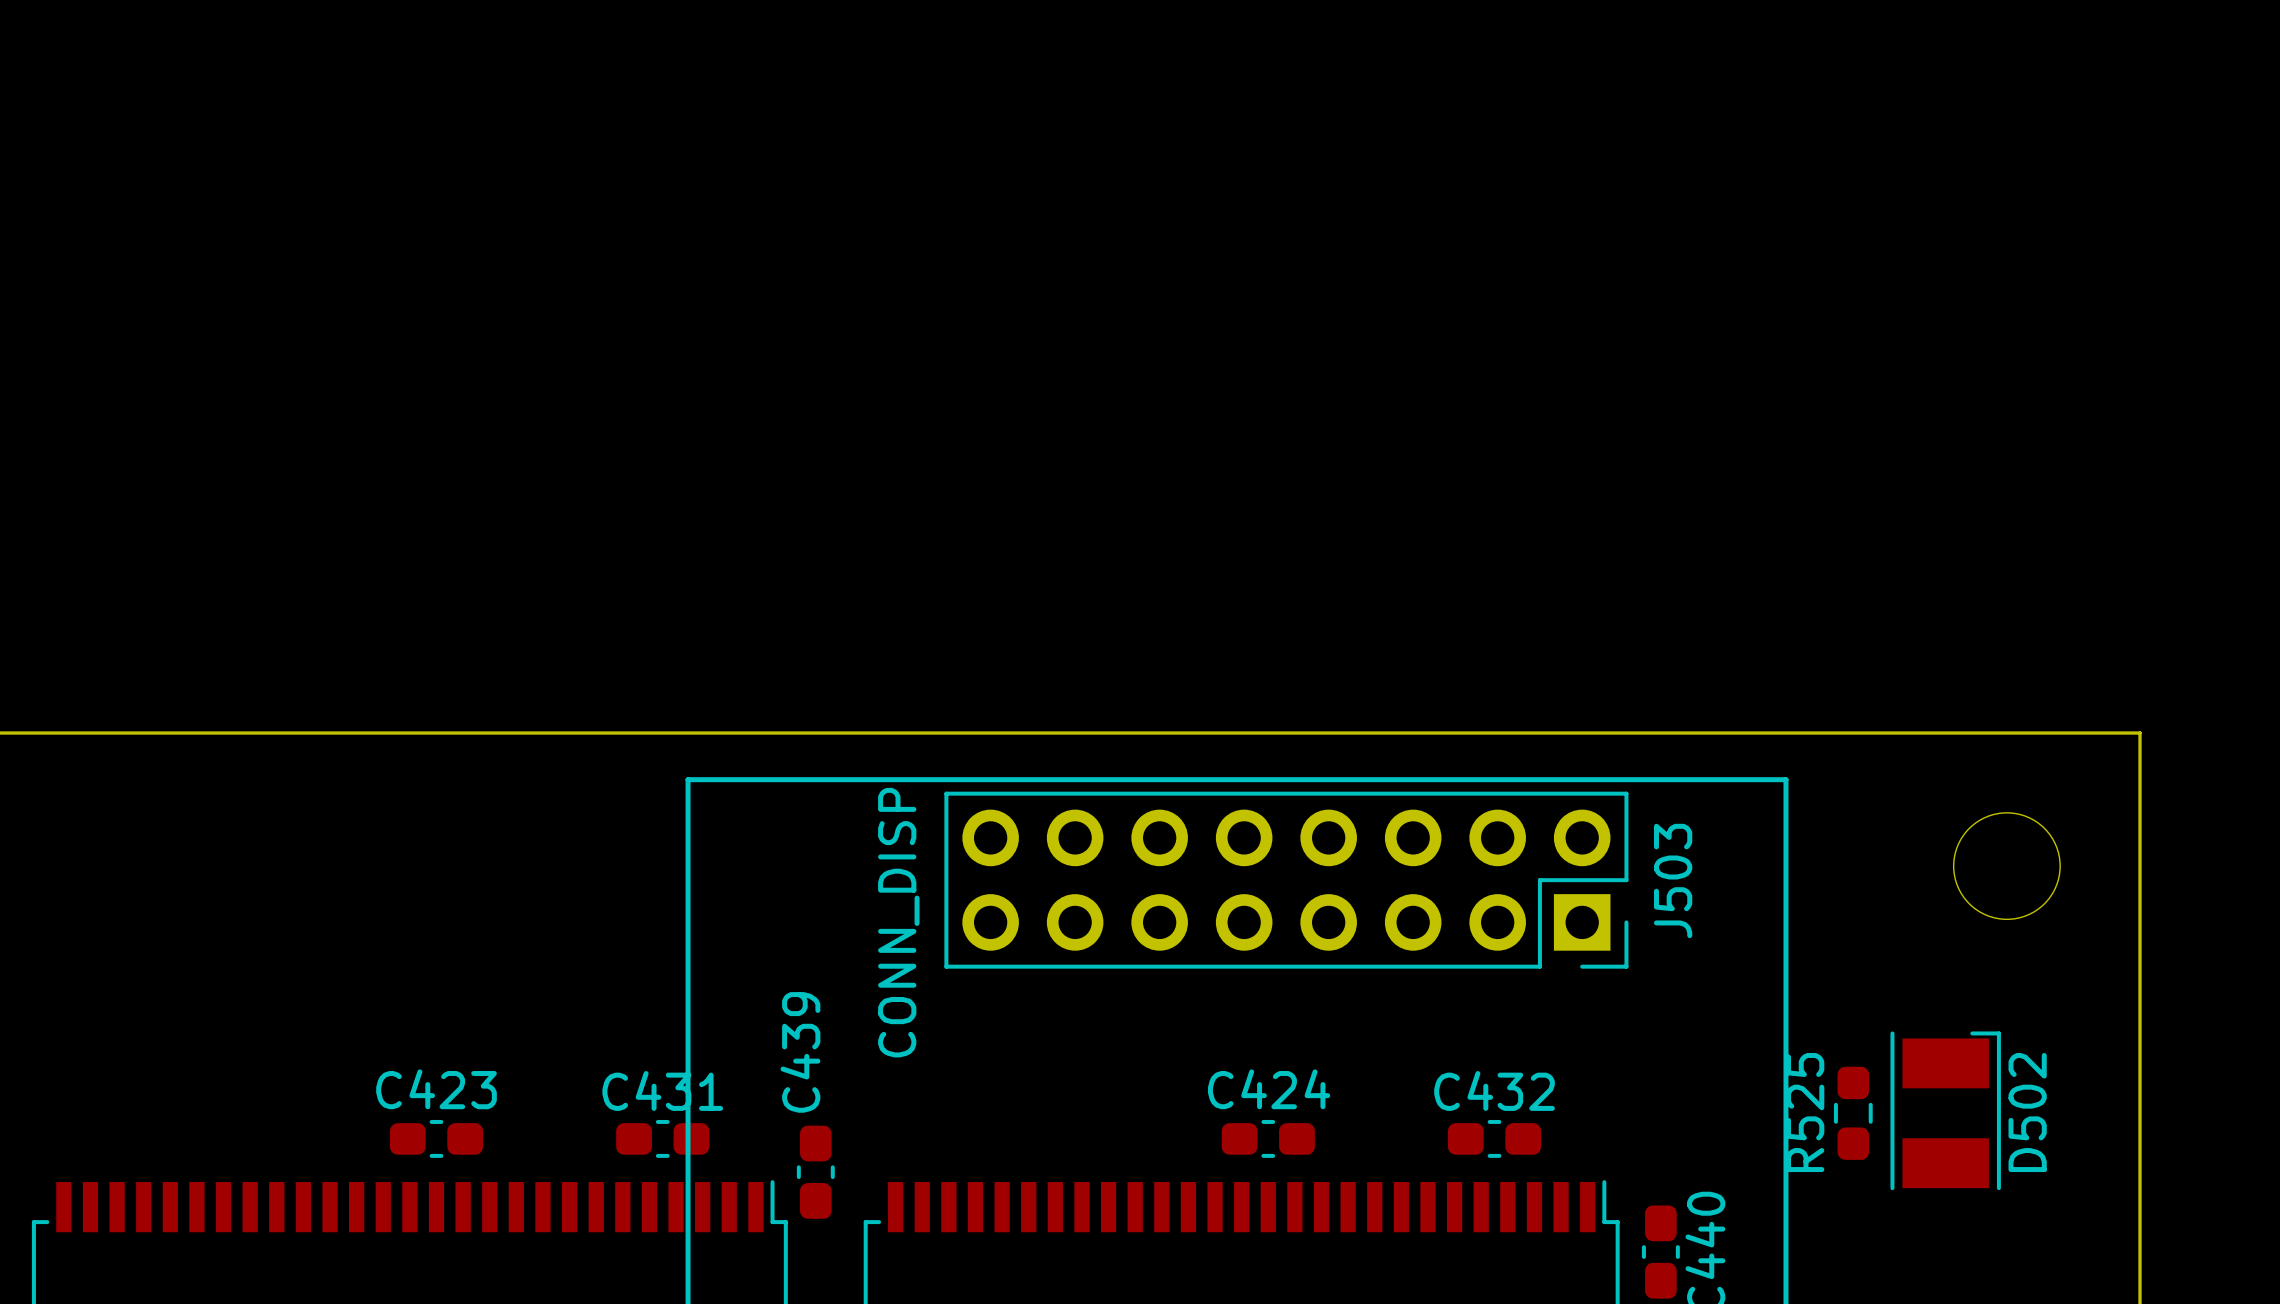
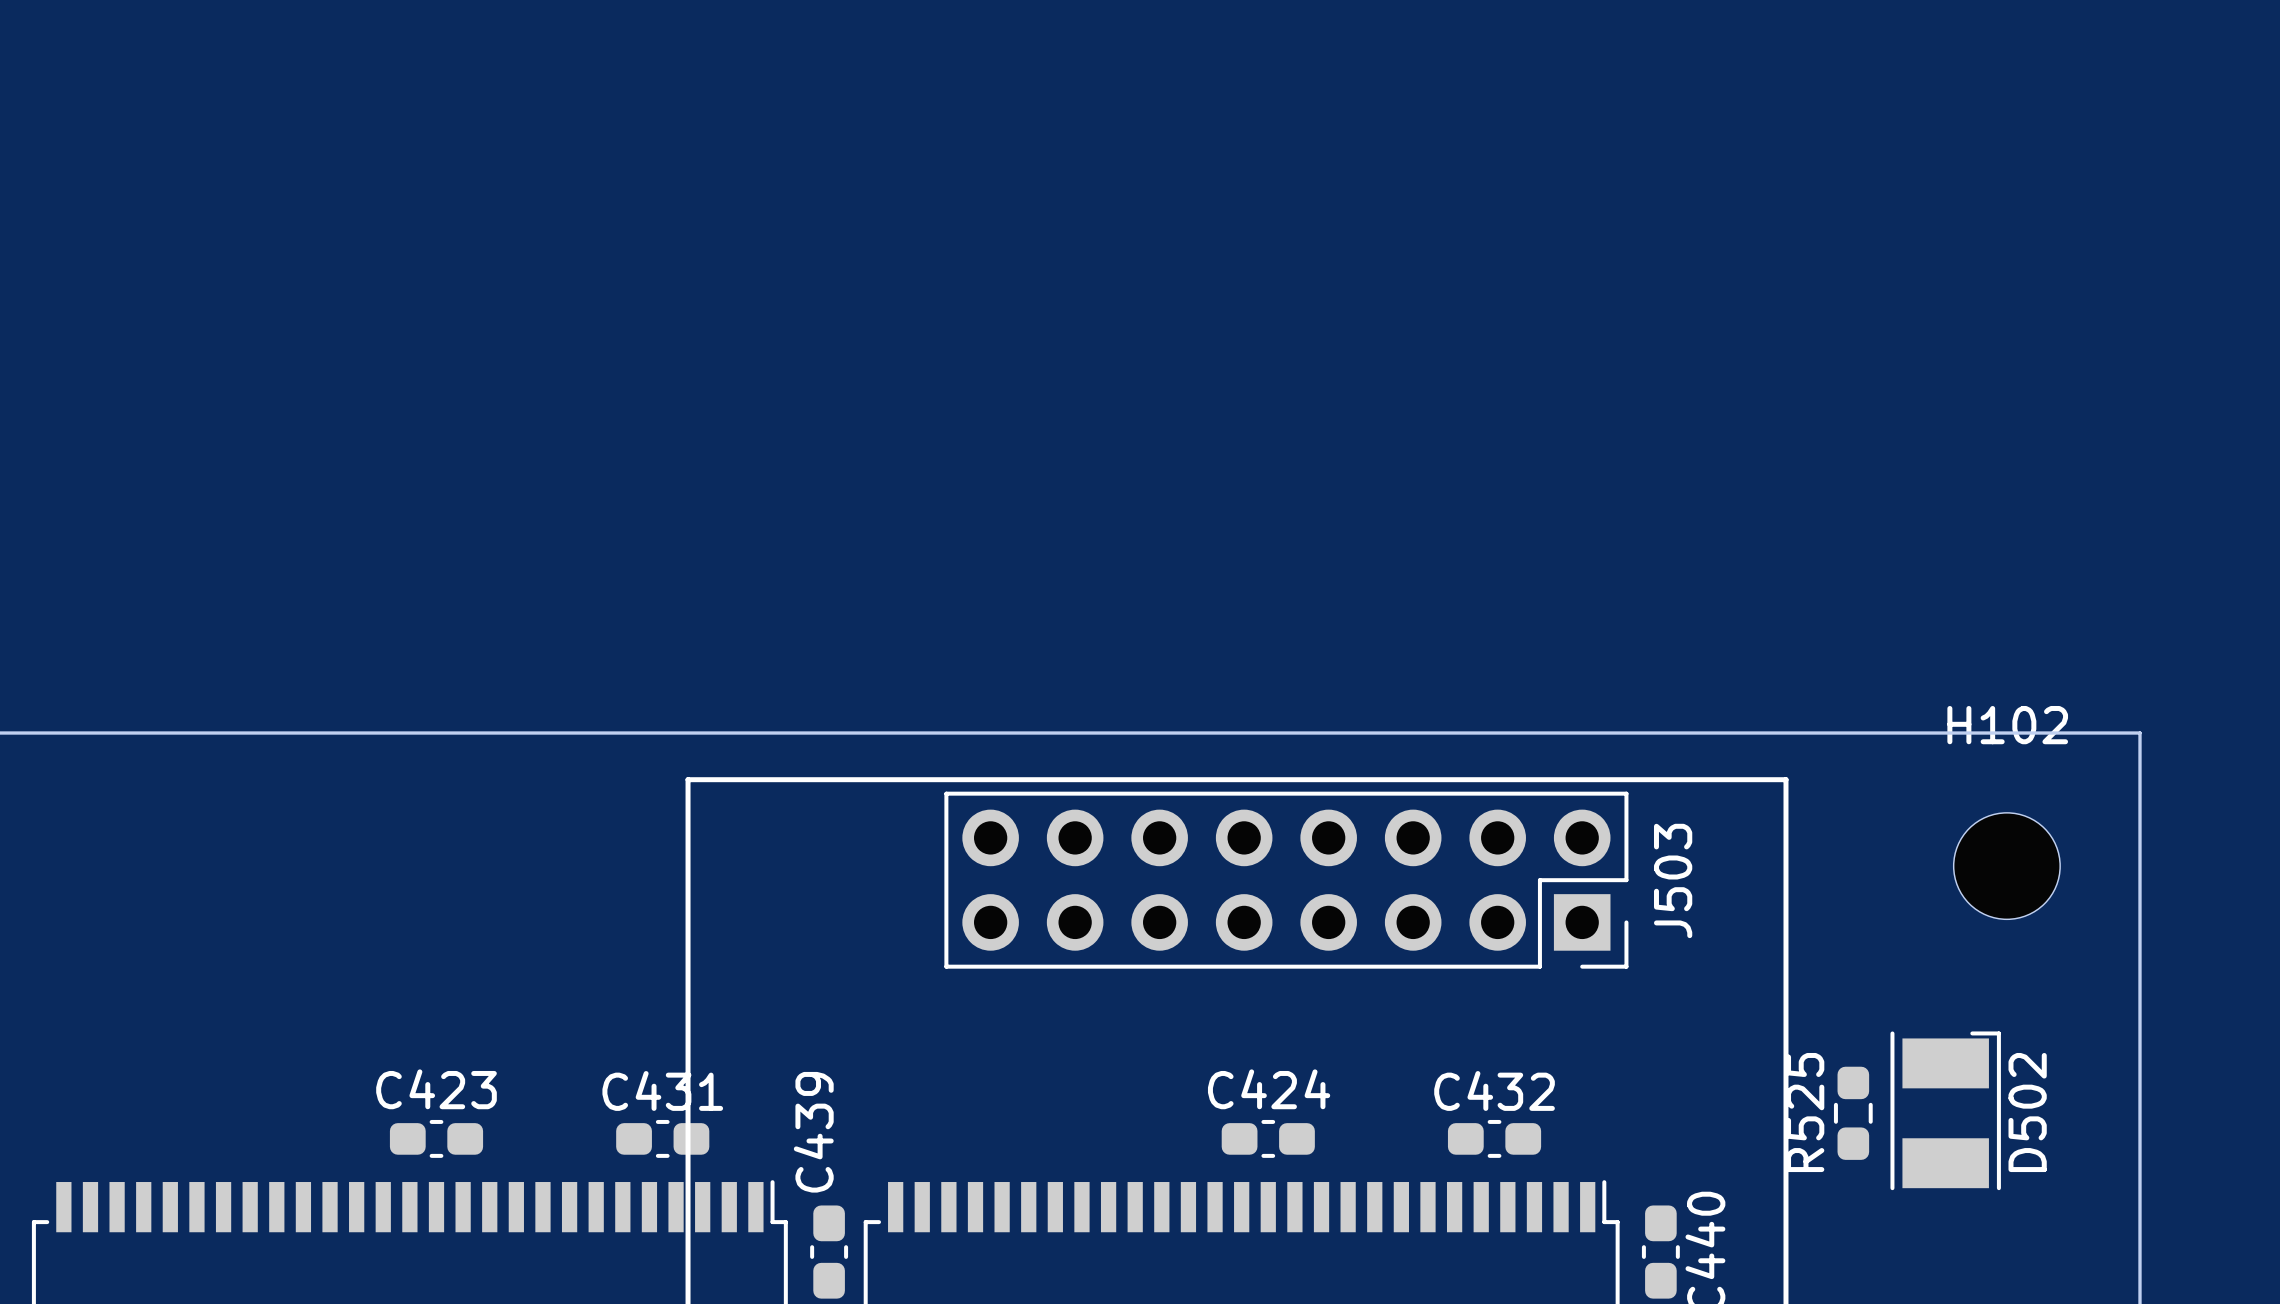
H102 name: none -> H102 (2007, 725)
J503 value: CONN_DISP (898, 922) -> none
C439 position: (815, 1172) -> (829, 1252)

